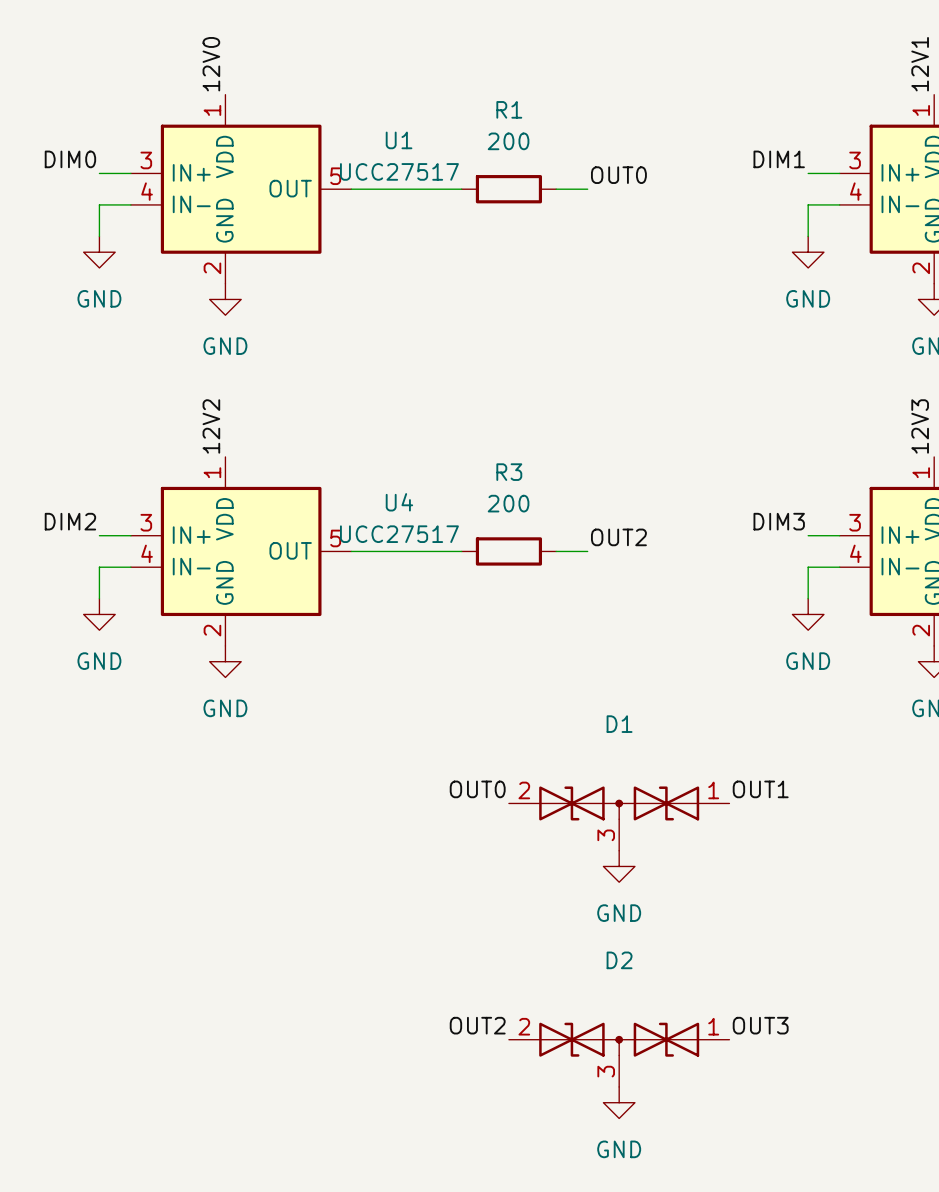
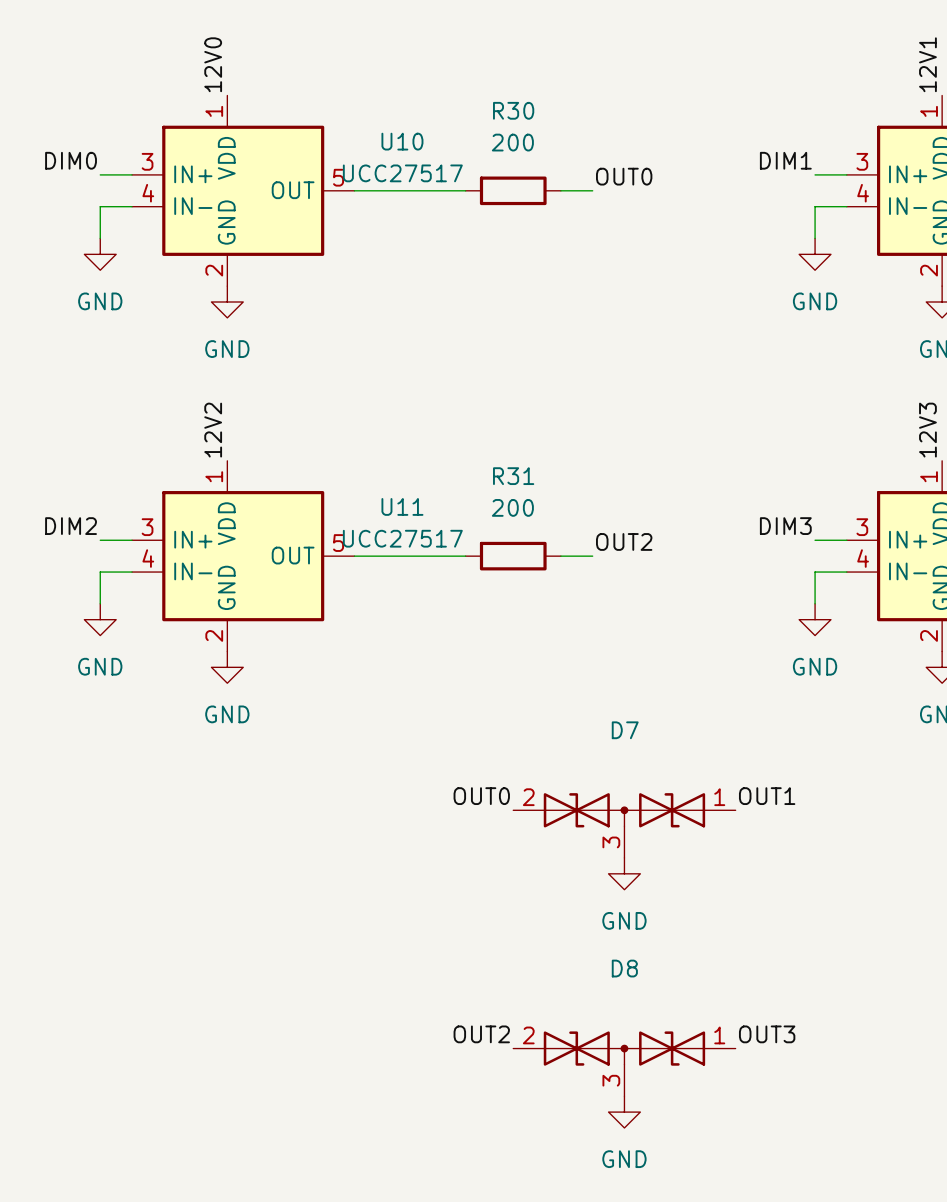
R1 name: R1 (509, 109) -> R30 (513, 110)
U1 name: U1 (399, 140) -> U10 (402, 141)
R3 name: R3 (509, 472) -> R31 (513, 476)
U4 name: U4 (399, 502) -> U11 (402, 506)
D1 name: D1 (619, 724) -> D7 (625, 730)
D2 name: D2 (619, 960) -> D8 (624, 968)

